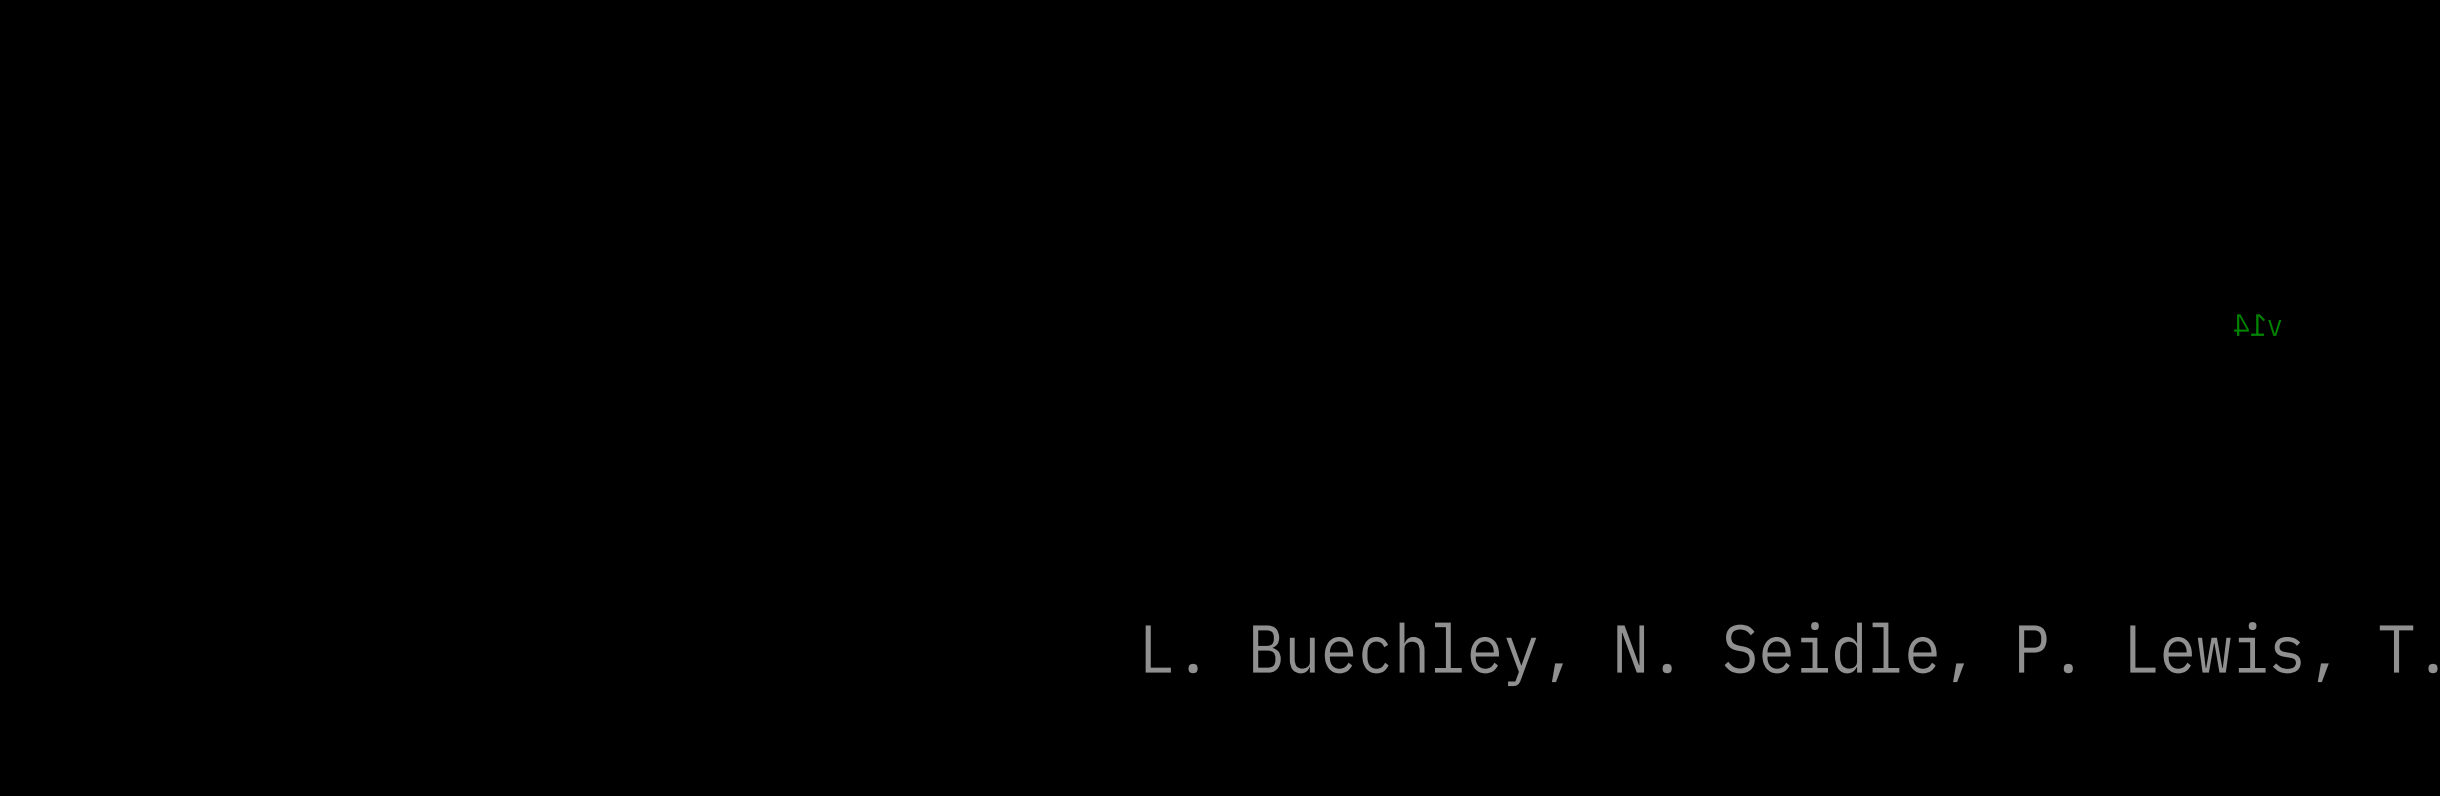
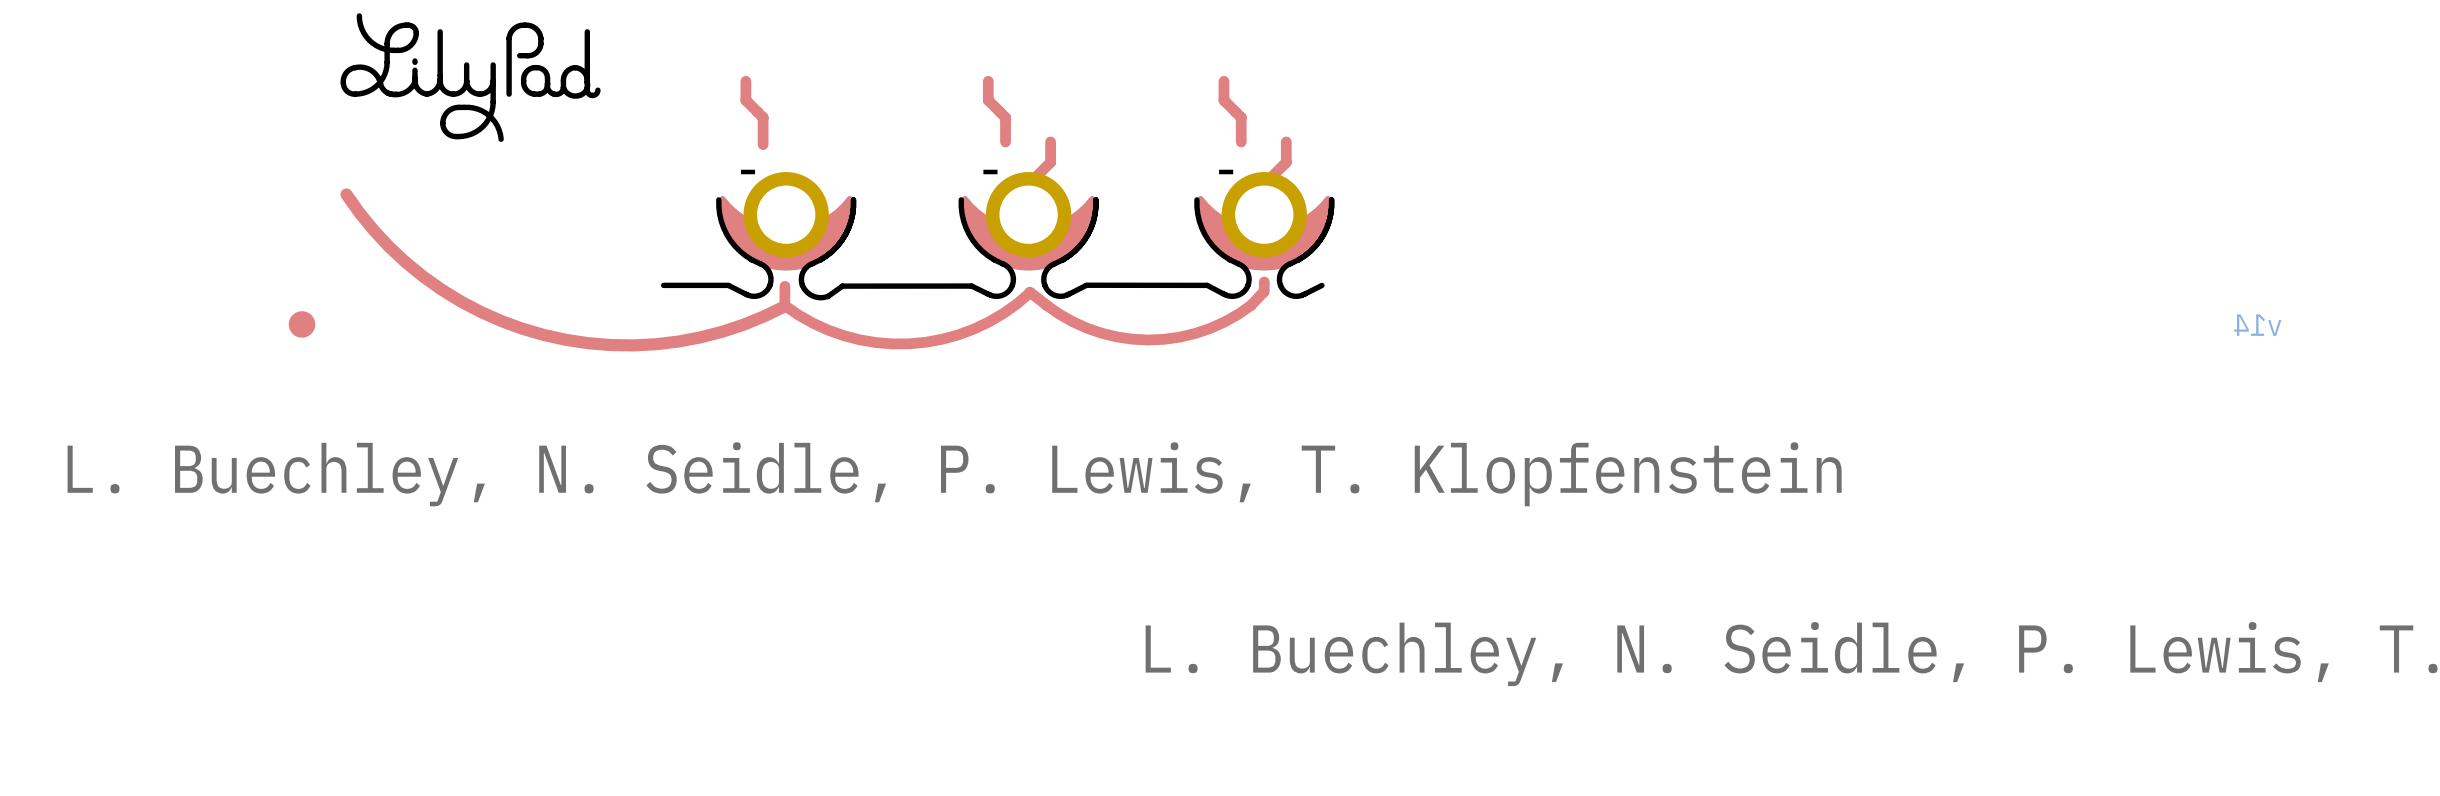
drawing: none -> [340, 13, 601, 142]
top track: none -> (745, 81) (745, 100) (763, 117) (763, 144)
top track: none -> (988, 81) (988, 100) (1005, 117) (1005, 141)
top track: none -> (1223, 81) (1223, 100) (1241, 117) (1241, 141)
top track: none -> (1050, 141) (1050, 162) (1028, 184) (1028, 214) (1030, 214)
top track: none -> (1286, 141) (1286, 162) (1264, 184) (1264, 214)
text: none -> - (748, 172)
text: none -> - (990, 172)
text: none -> - (1226, 172)
top track: none -> (346, 194) (359, 212) (389, 246) (423, 276) (441, 289) (480, 311) (501, 320) (544, 335) (588, 343) (633, 345) (655, 344) (700, 337) (722, 331) (743, 324) (784, 306)
board edge: none -> (718, 199) (721, 221) (726, 234) (740, 251) (751, 259)
board edge: none -> (853, 199) (851, 221) (845, 234) (832, 251) (820, 259) (826, 255) (832, 251) (837, 246) (845, 234) (848, 228) (851, 221) (853, 207) (853, 199)
board edge: none -> (961, 199) (963, 221) (969, 234) (982, 251) (994, 259)
board edge: none -> (1095, 199) (1093, 221) (1087, 234) (1074, 251) (1062, 259) (1069, 255) (1074, 251) (1079, 246) (1087, 234) (1091, 228) (1093, 221) (1095, 207) (1095, 199)
board edge: none -> (1196, 199) (1199, 221) (1204, 234) (1218, 251) (1229, 259)
board edge: none -> (1331, 199) (1329, 221) (1323, 234) (1310, 251) (1298, 259) (1304, 255) (1310, 251) (1315, 246) (1323, 234) (1326, 228) (1329, 221) (1331, 207) (1331, 199)
part: none -> (786, 221)
part: none -> (1028, 221)
part: none -> (1264, 221)
board edge: none -> (751, 259) (763, 265) (769, 272) (770, 280) (767, 290) (759, 295) (752, 296) (728, 285)
board edge: none -> (820, 259) (805, 268) (801, 276) (801, 283) (804, 289) (811, 295) (819, 297) (828, 296)
board edge: none -> (993, 259) (1006, 265) (1011, 272) (1013, 280) (1009, 290) (1001, 295) (994, 296) (971, 286)
board edge: none -> (1063, 259) (1050, 265) (1045, 272) (1043, 280) (1047, 290) (1055, 295) (1062, 296) (1086, 285)
board edge: none -> (1229, 259) (1241, 265) (1247, 272) (1249, 280) (1245, 290) (1237, 295) (1230, 296) (1207, 285)
board edge: none -> (1299, 259) (1286, 265) (1281, 272) (1279, 280) (1283, 290) (1290, 295) (1298, 296) (1321, 285)
top track: none -> (1264, 282) (1264, 291)
board edge: none -> (663, 285) (728, 285)
board edge: none -> (1086, 285) (1207, 285)
top track: none -> (784, 286) (784, 305) (813, 323) (843, 335) (893, 343) (926, 342) (974, 328) (1003, 313) (1029, 292) (1058, 313) (1101, 333) (1132, 339) (1179, 337) (1224, 322) (1250, 305) (1263, 292)
board edge: none -> (971, 286) (842, 286) (828, 296)
part: none -> (302, 324)
text: none -> L. Buechley, N. Seidle, P. Lewis, T. Klopfenstein (954, 474)

